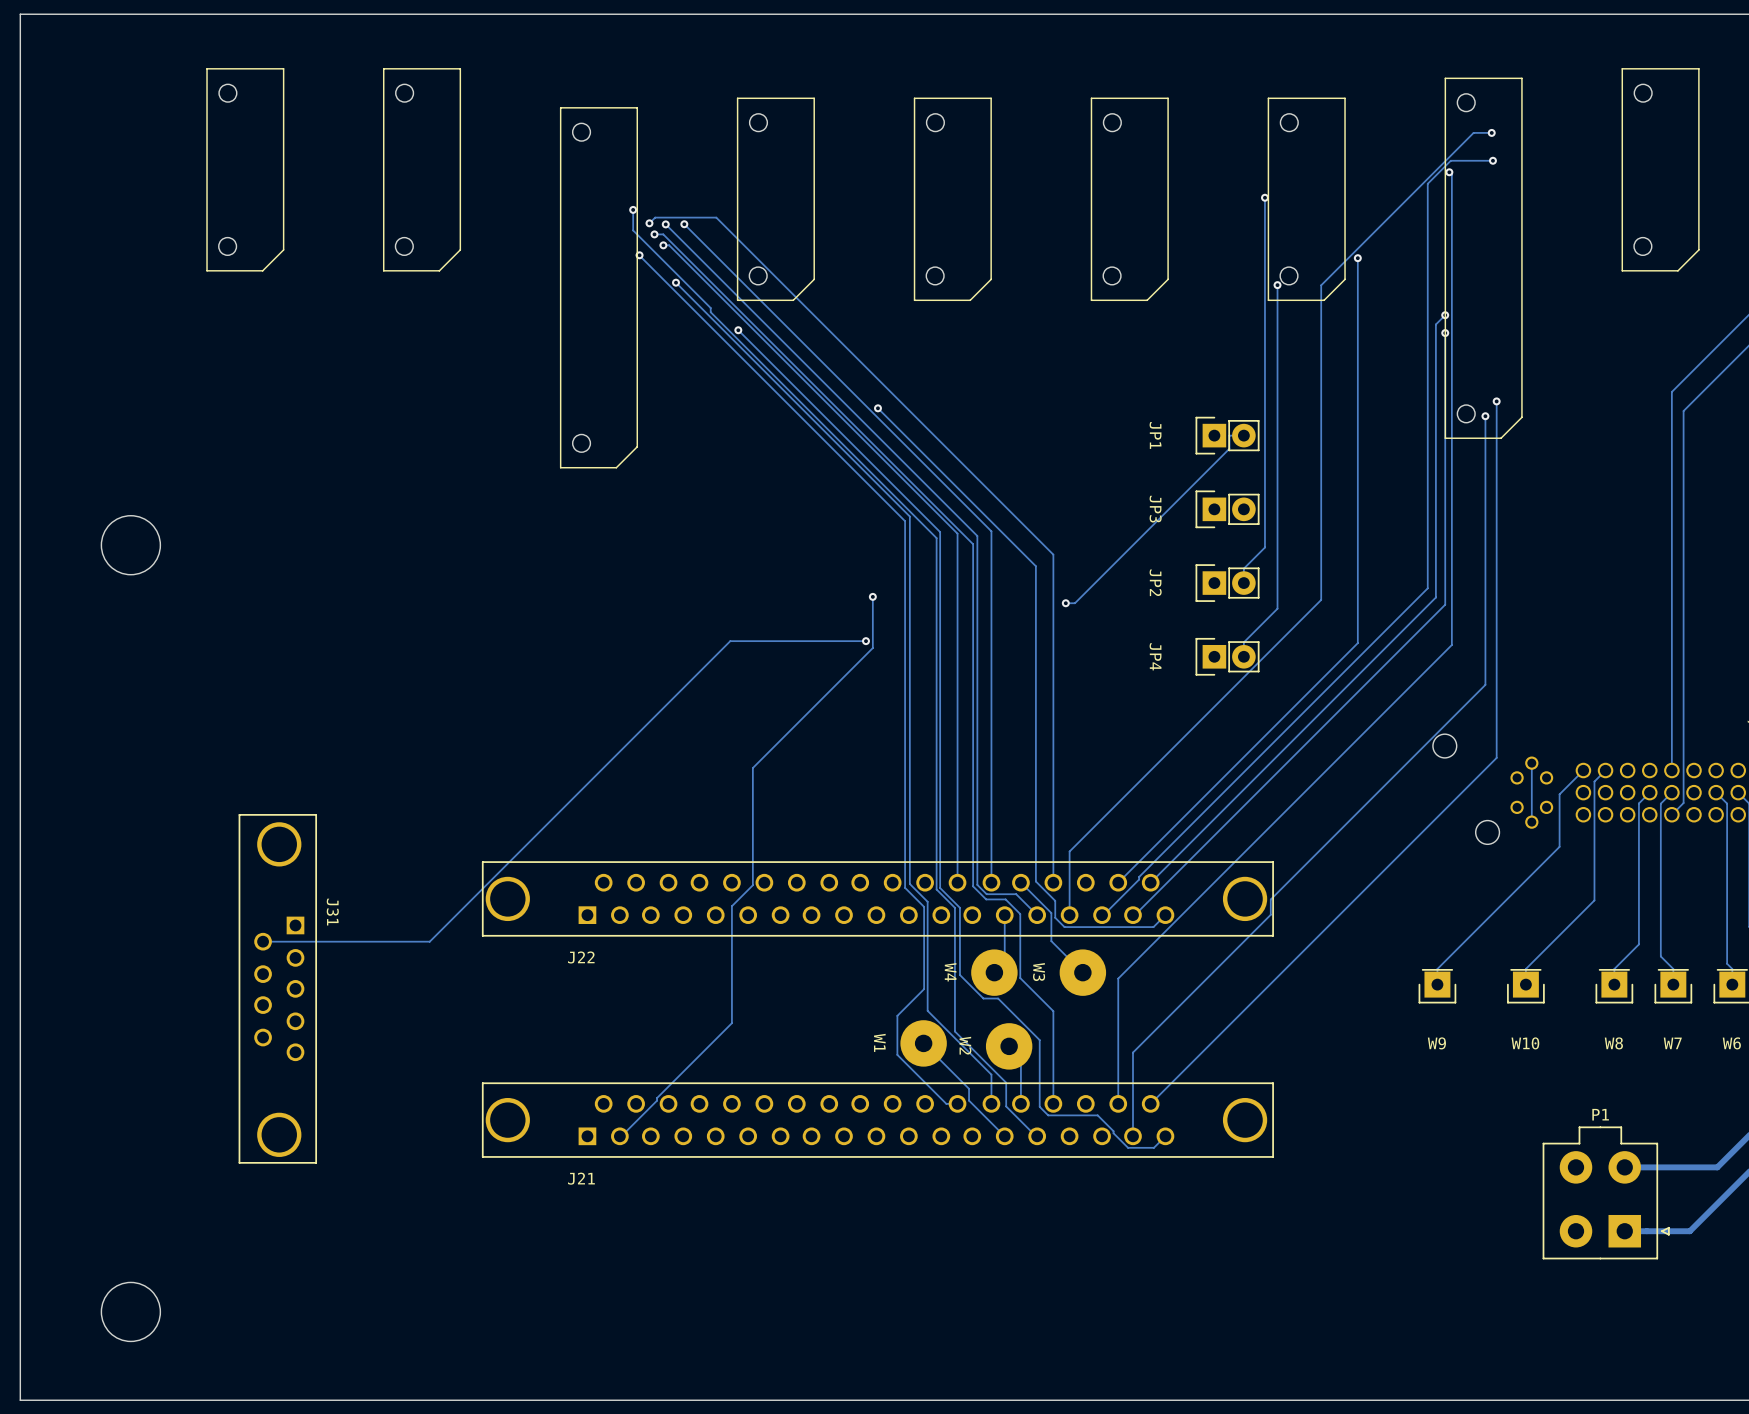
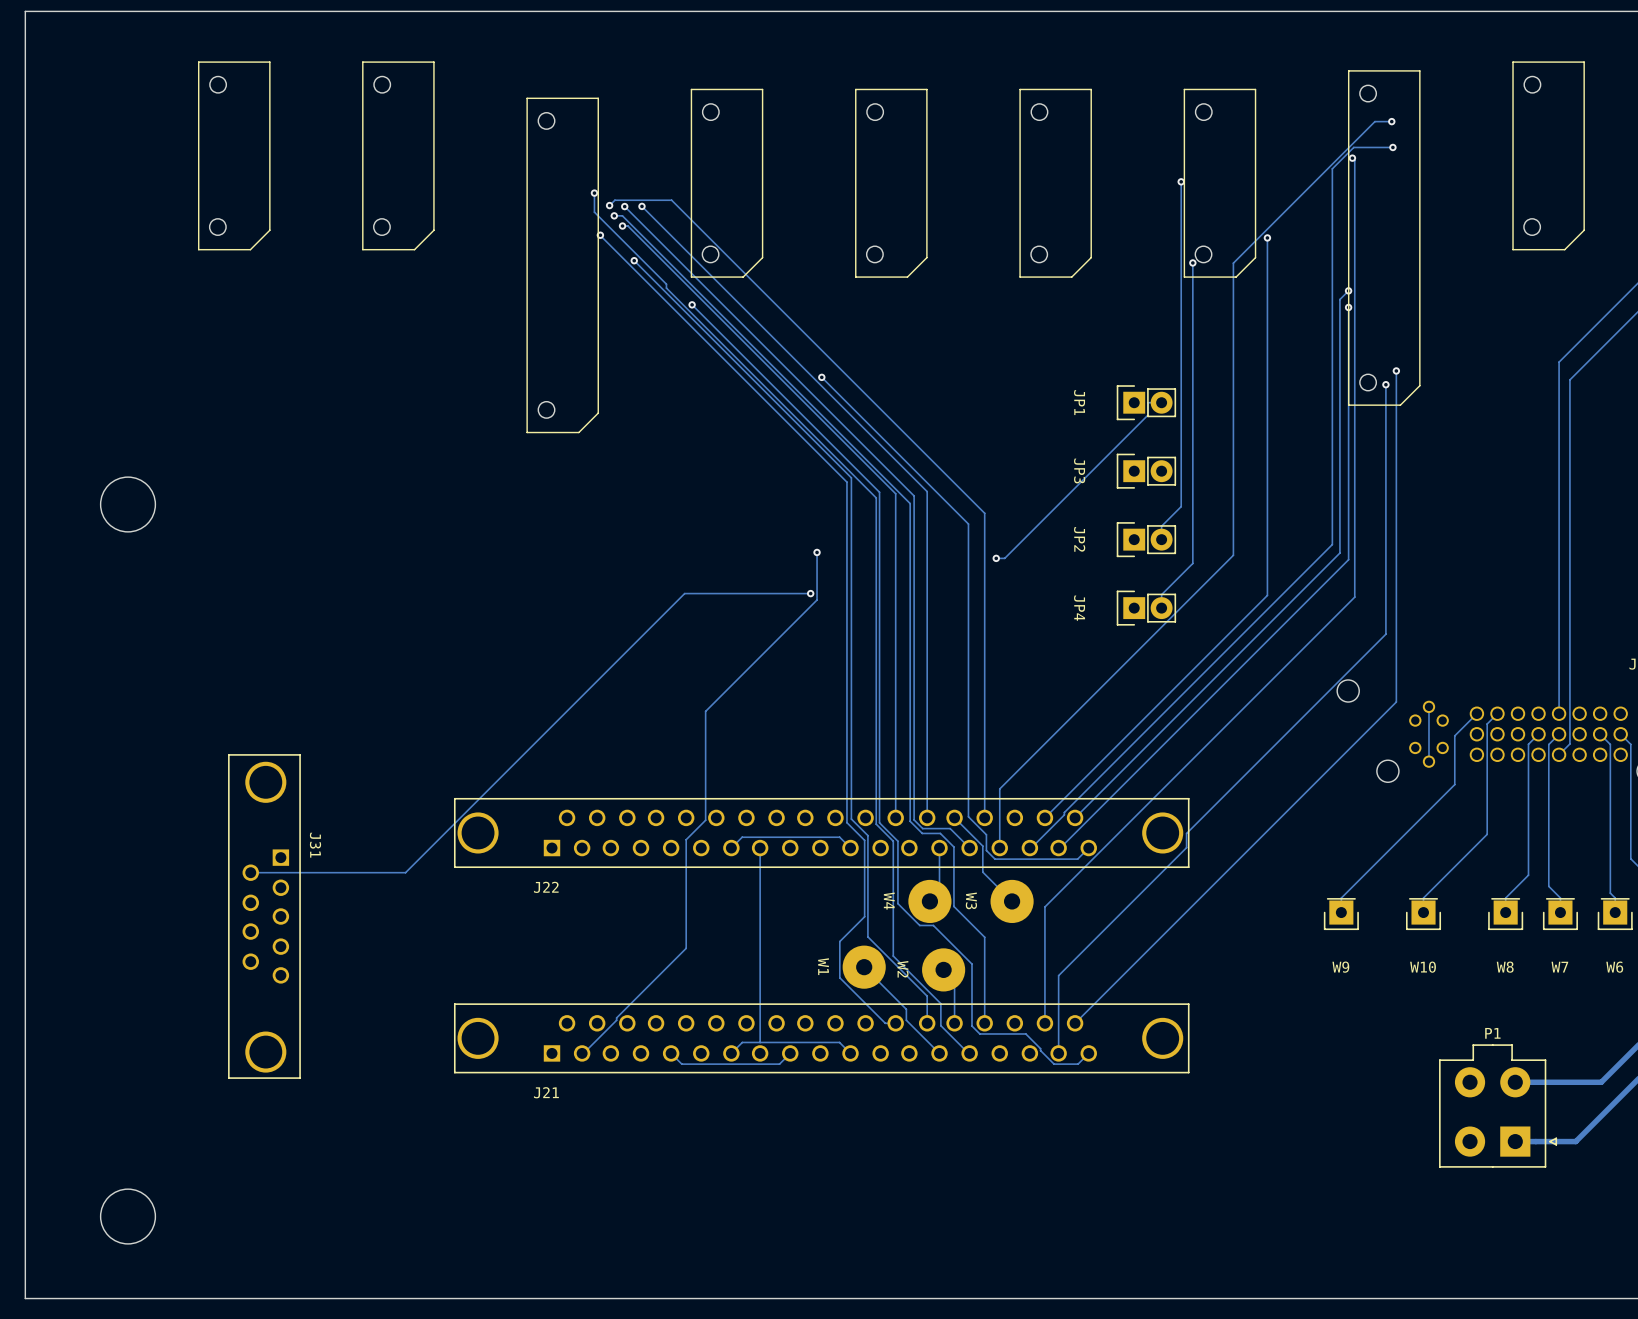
track: none -> (760, 848) (760, 1042)
track: none -> (850, 848) (839, 837) (742, 837) (731, 848)
track: none -> (790, 1053) (779, 1064) (681, 1064) (671, 1053)
track: none -> (850, 1053) (839, 1042) (742, 1042) (731, 1053)

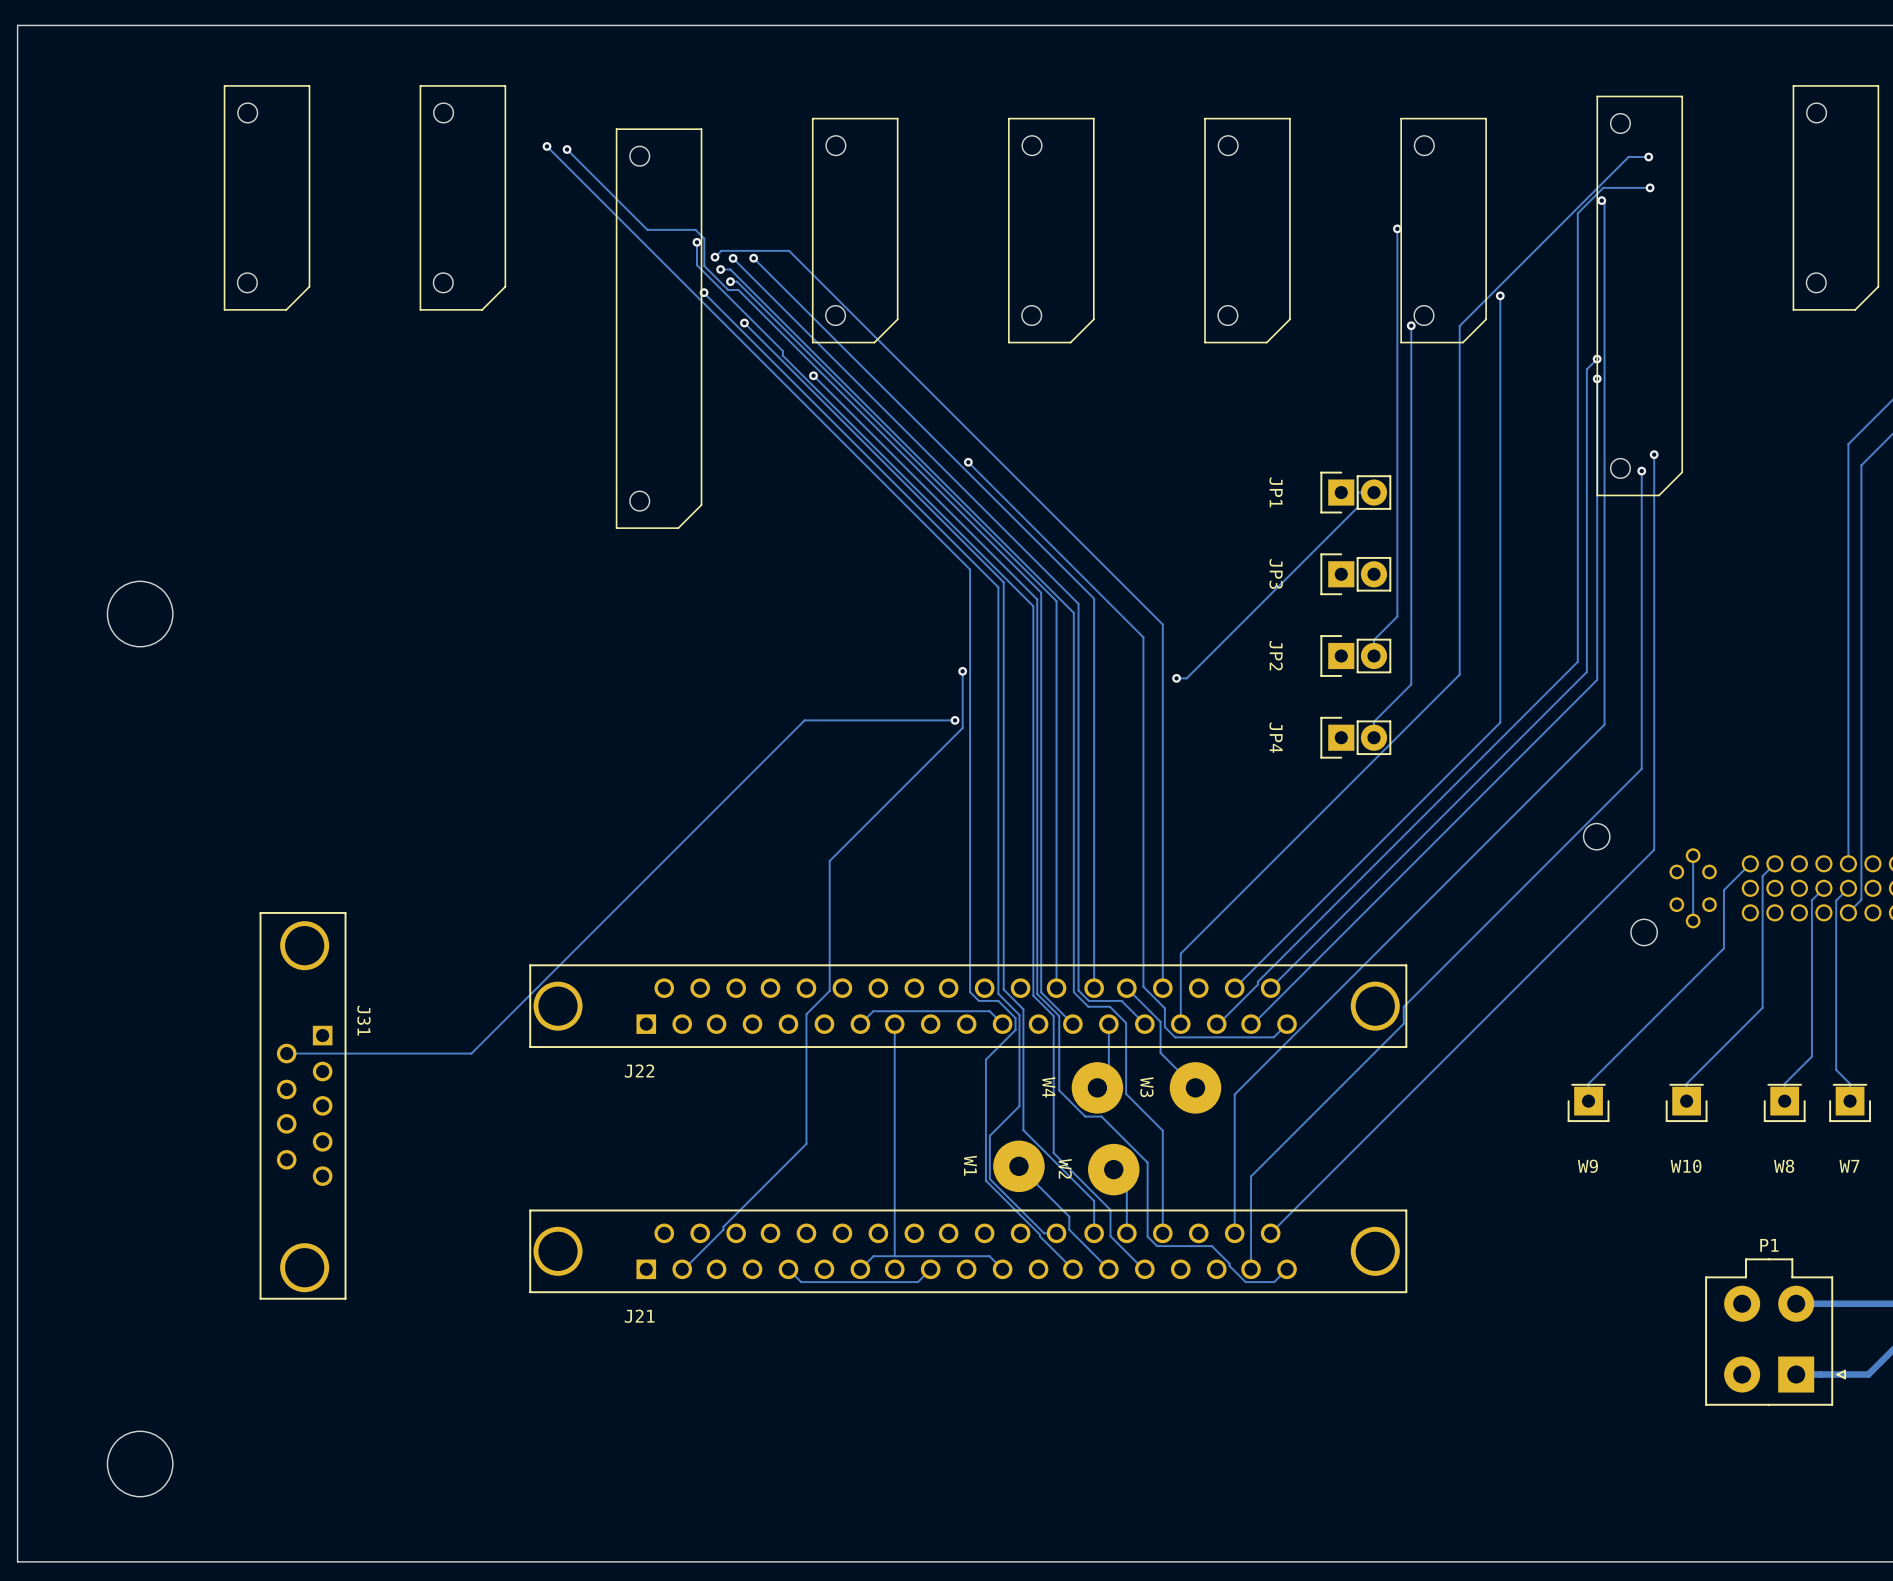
track: none -> (547, 146) (970, 569) (970, 992) (978, 1000) (998, 1000) (1015, 1018) (1015, 1030) (985, 1059) (985, 1180) (1072, 1269)
via: none -> (547, 146)
track: none -> (567, 149) (647, 229) (695, 229) (704, 238) (704, 266) (728, 289) (738, 289) (1041, 592) (1041, 992) (1072, 1024)
via: none -> (567, 149)

